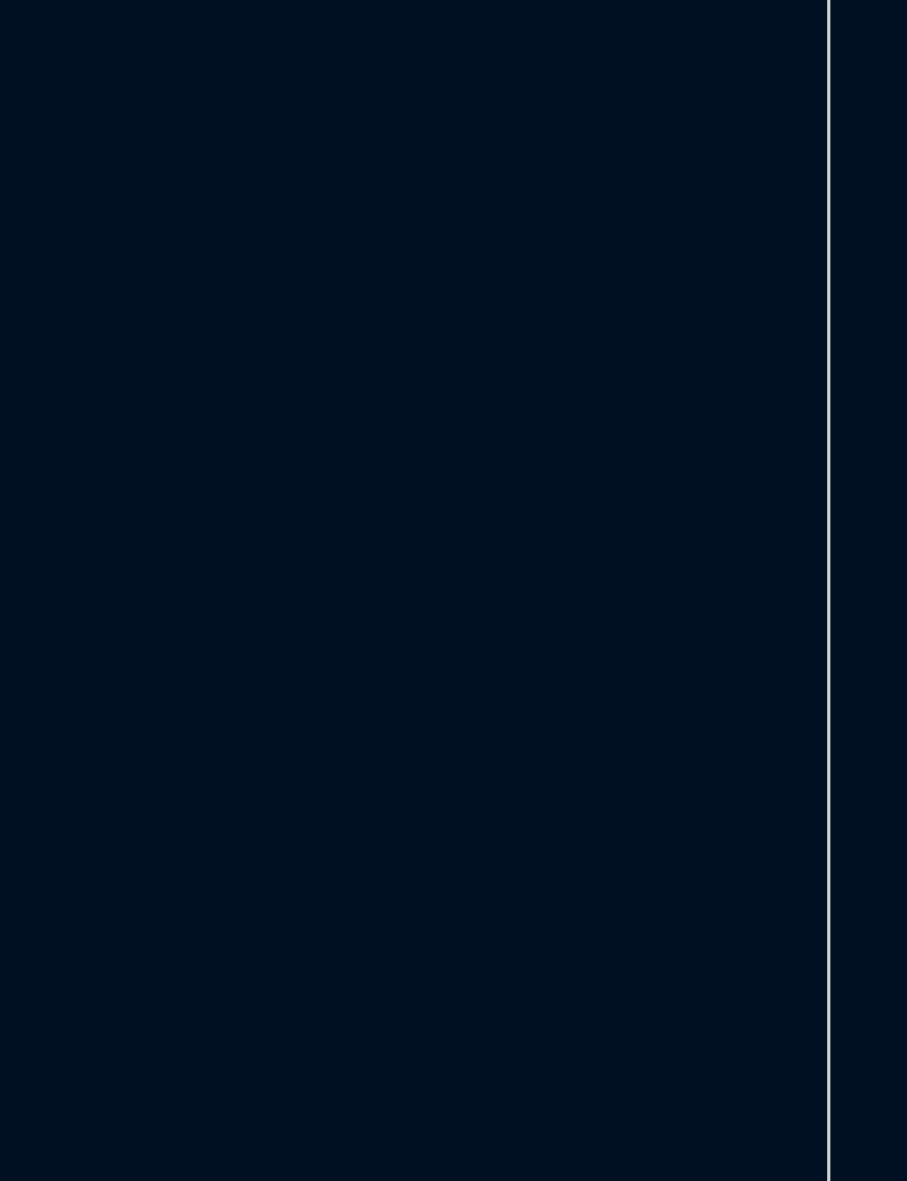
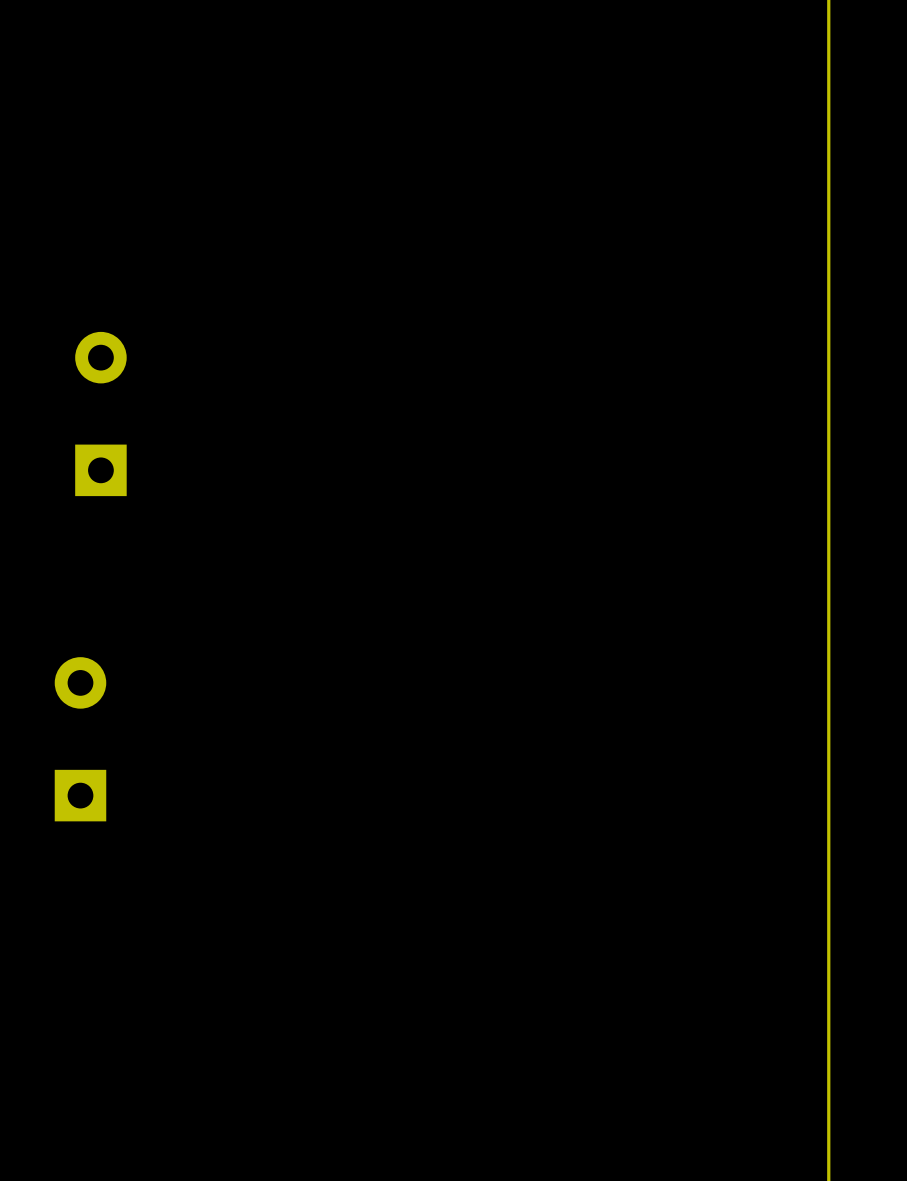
part: none -> (100, 413)
part: none -> (80, 739)

